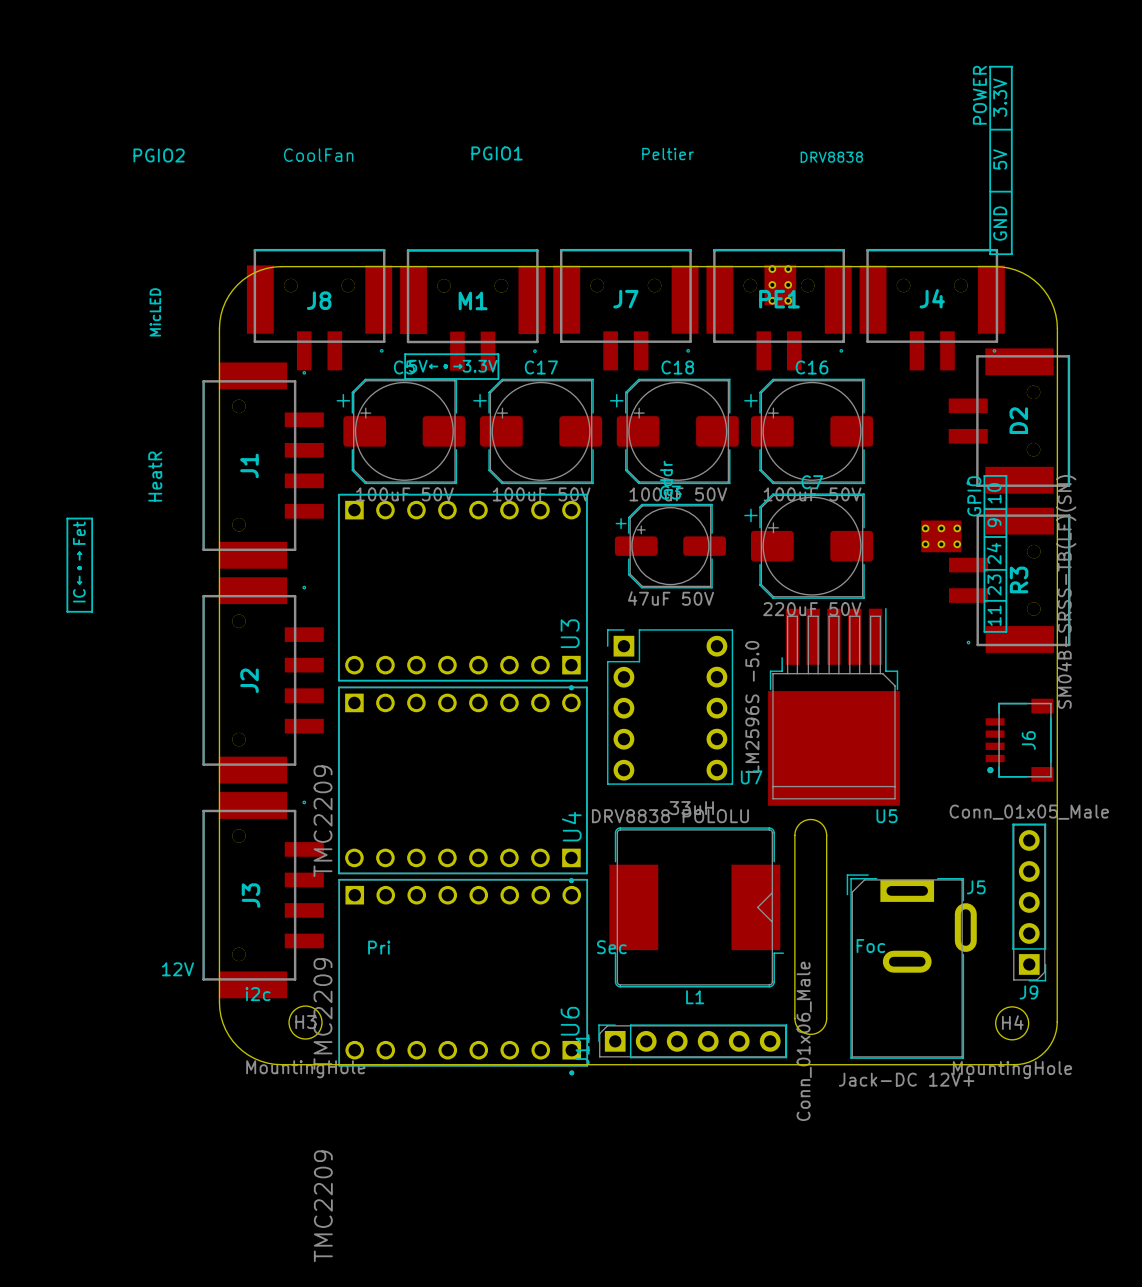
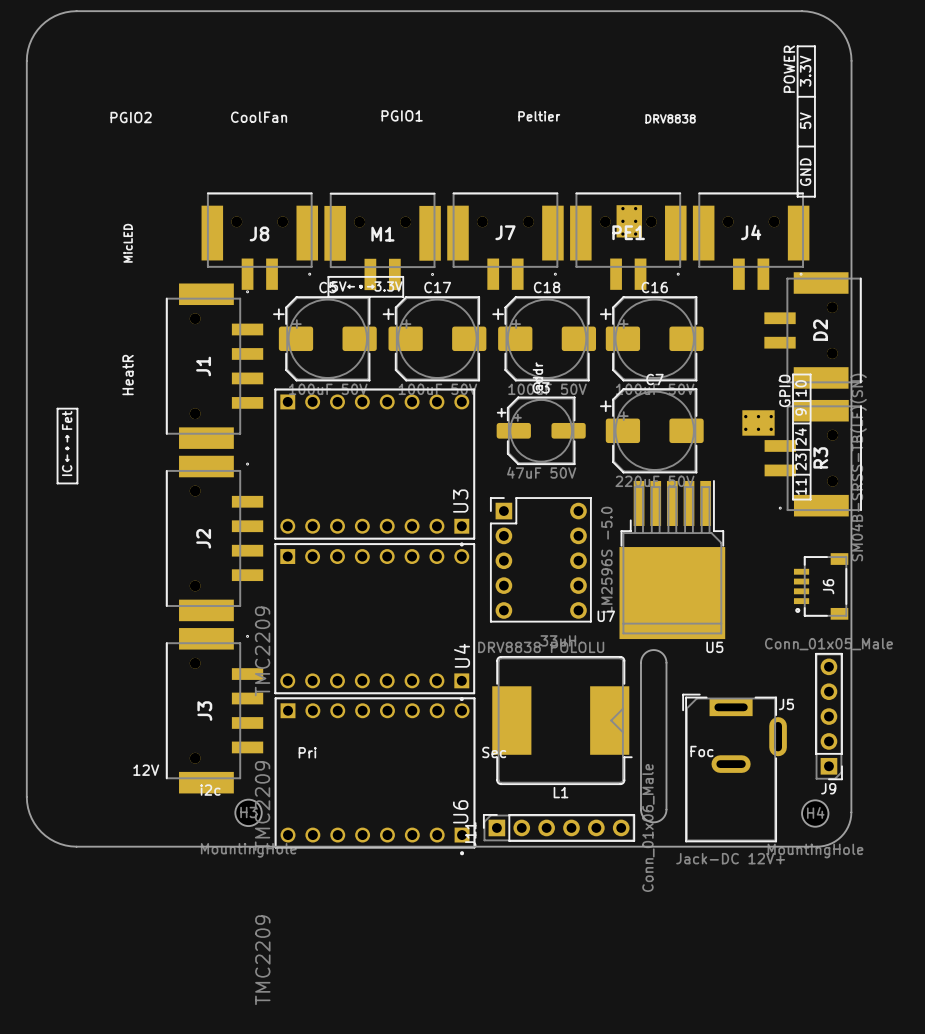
board edge: (1057, 1021) (1057, 328) (1053, 308) (1047, 295) (1039, 284) (1028, 276) (1015, 270) (995, 266) (281, 266) (267, 268) (254, 272) (237, 284) (228, 295) (222, 308) (219, 328) (219, 1009) (225, 1029) (237, 1046) (254, 1058) (267, 1063) (281, 1064) -> (851, 812) (851, 60) (848, 44) (836, 25) (823, 16) (801, 11) (65, 12) (50, 18) (37, 29) (29, 44) (26, 60) (28, 808) (34, 823) (41, 832) (54, 841) (65, 845) (229, 846)

